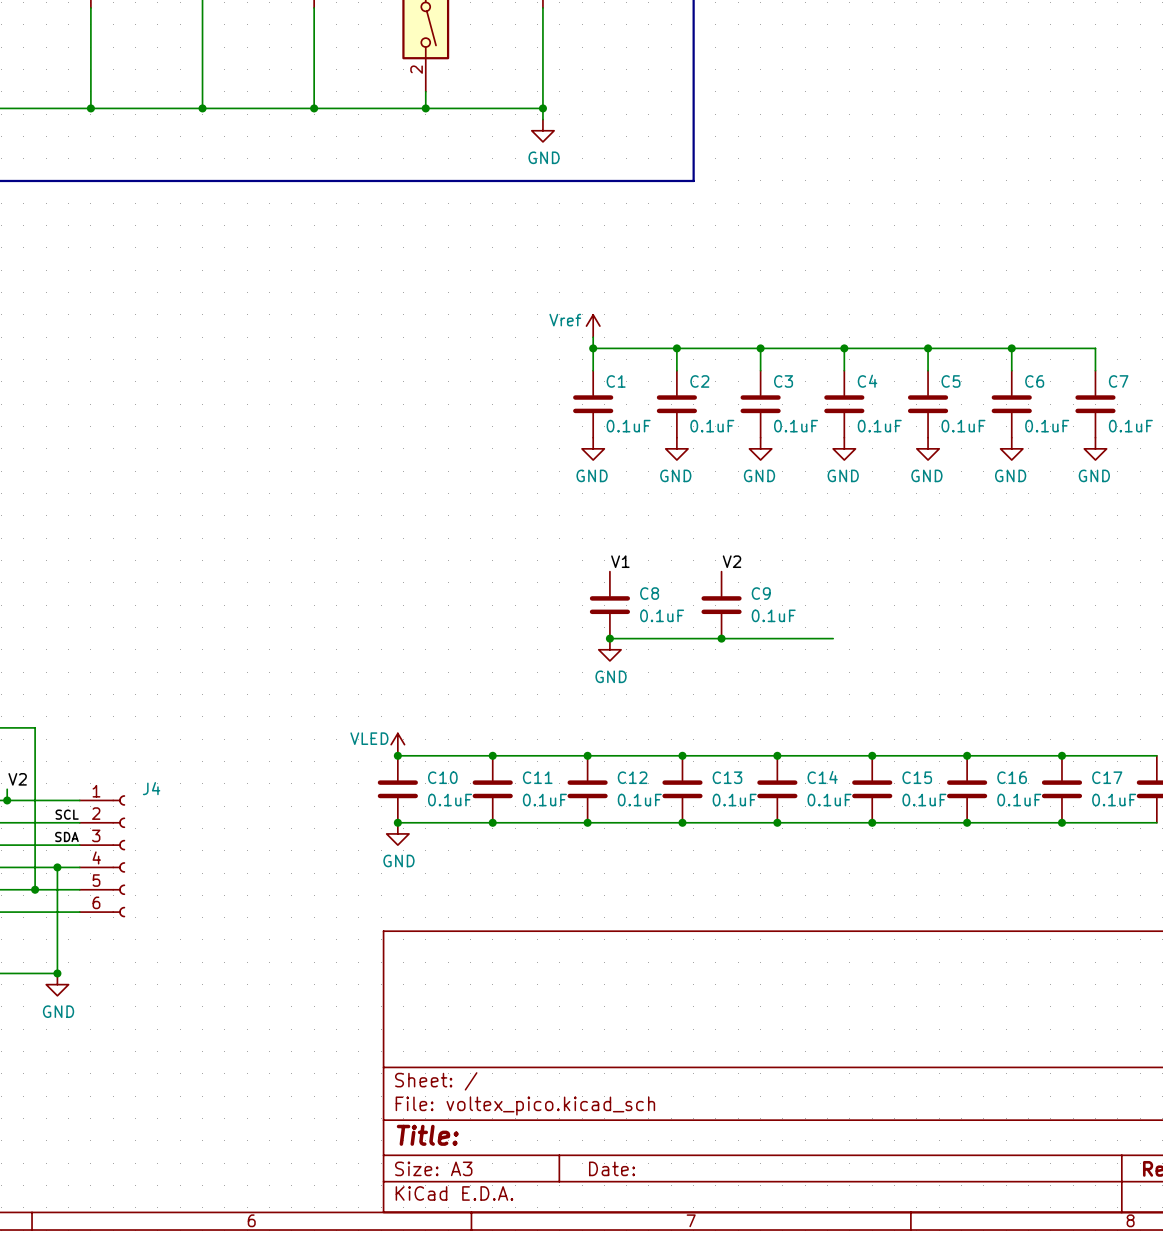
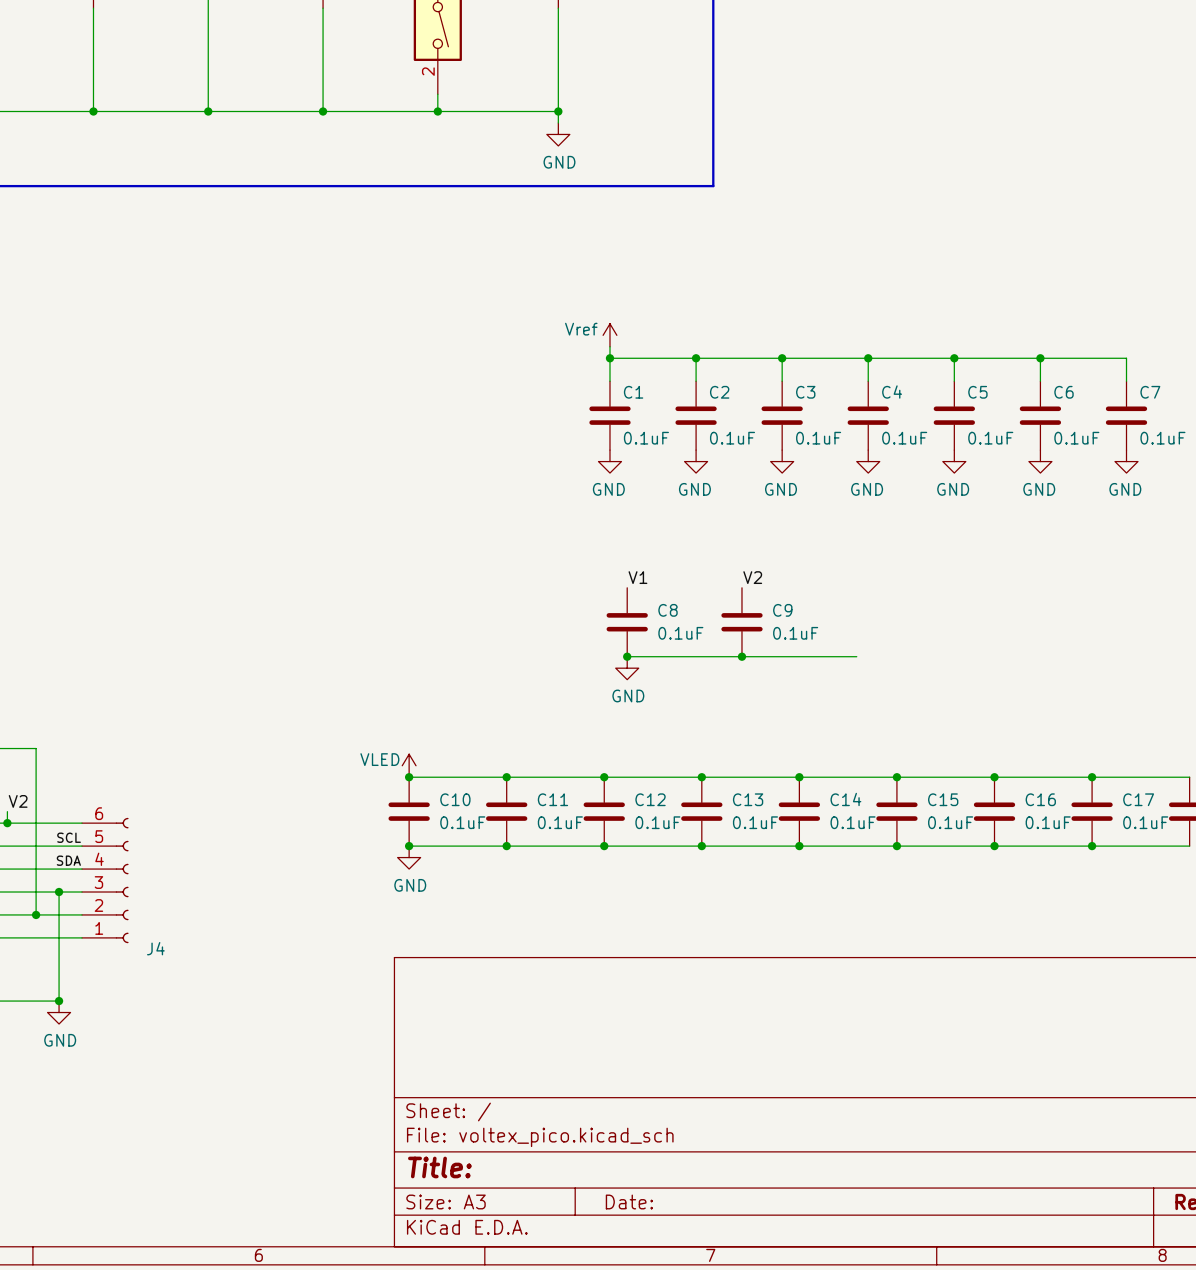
J4 flip: as is (118, 856) -> up-down (122, 880)

